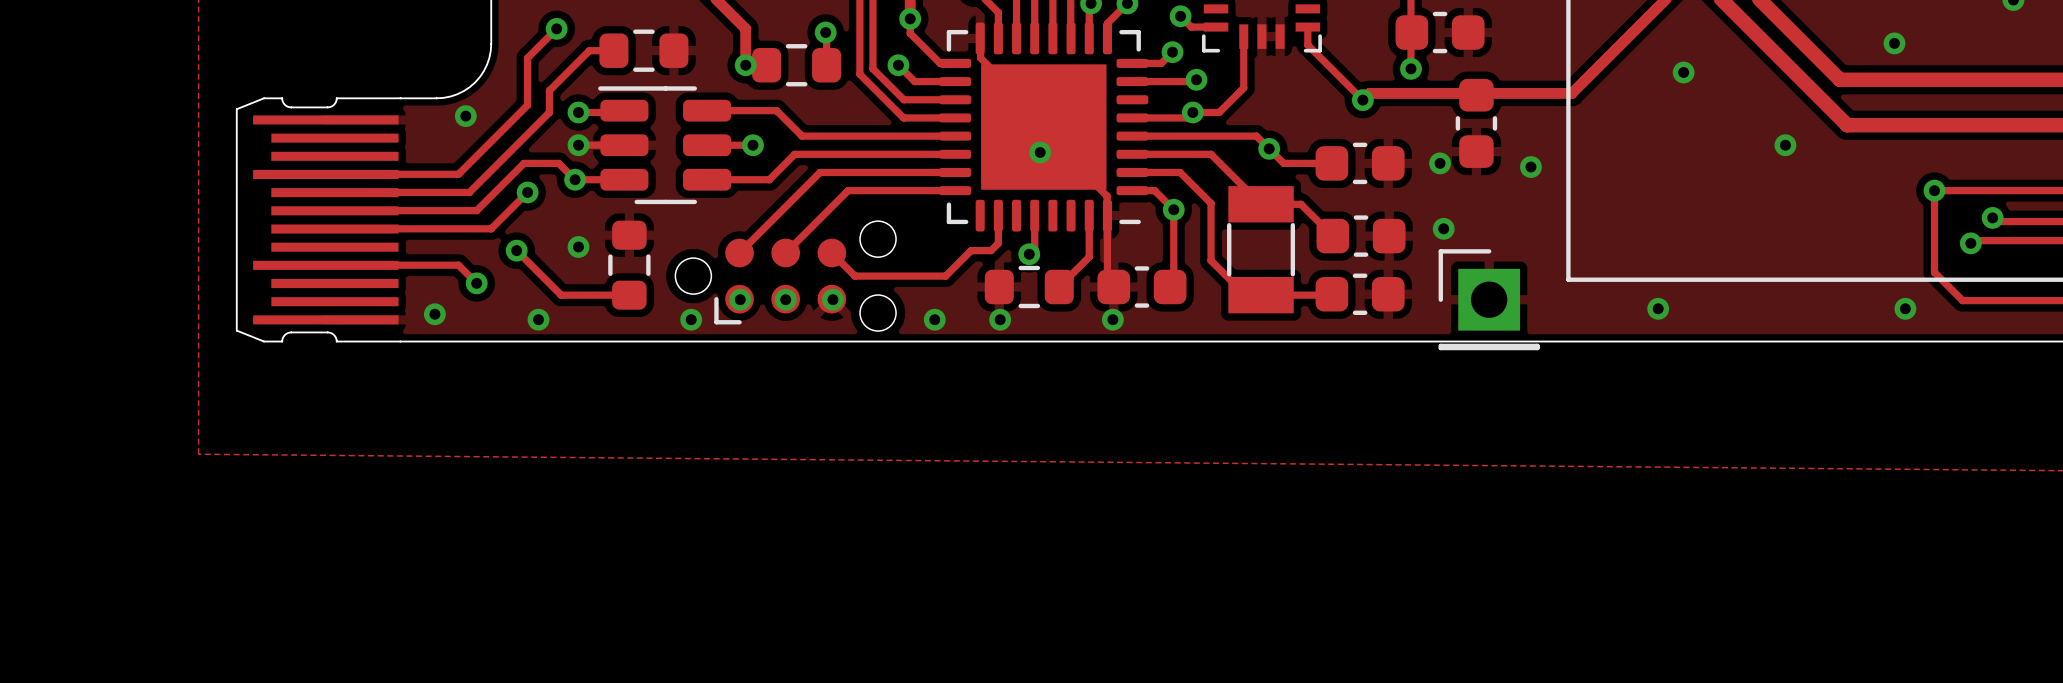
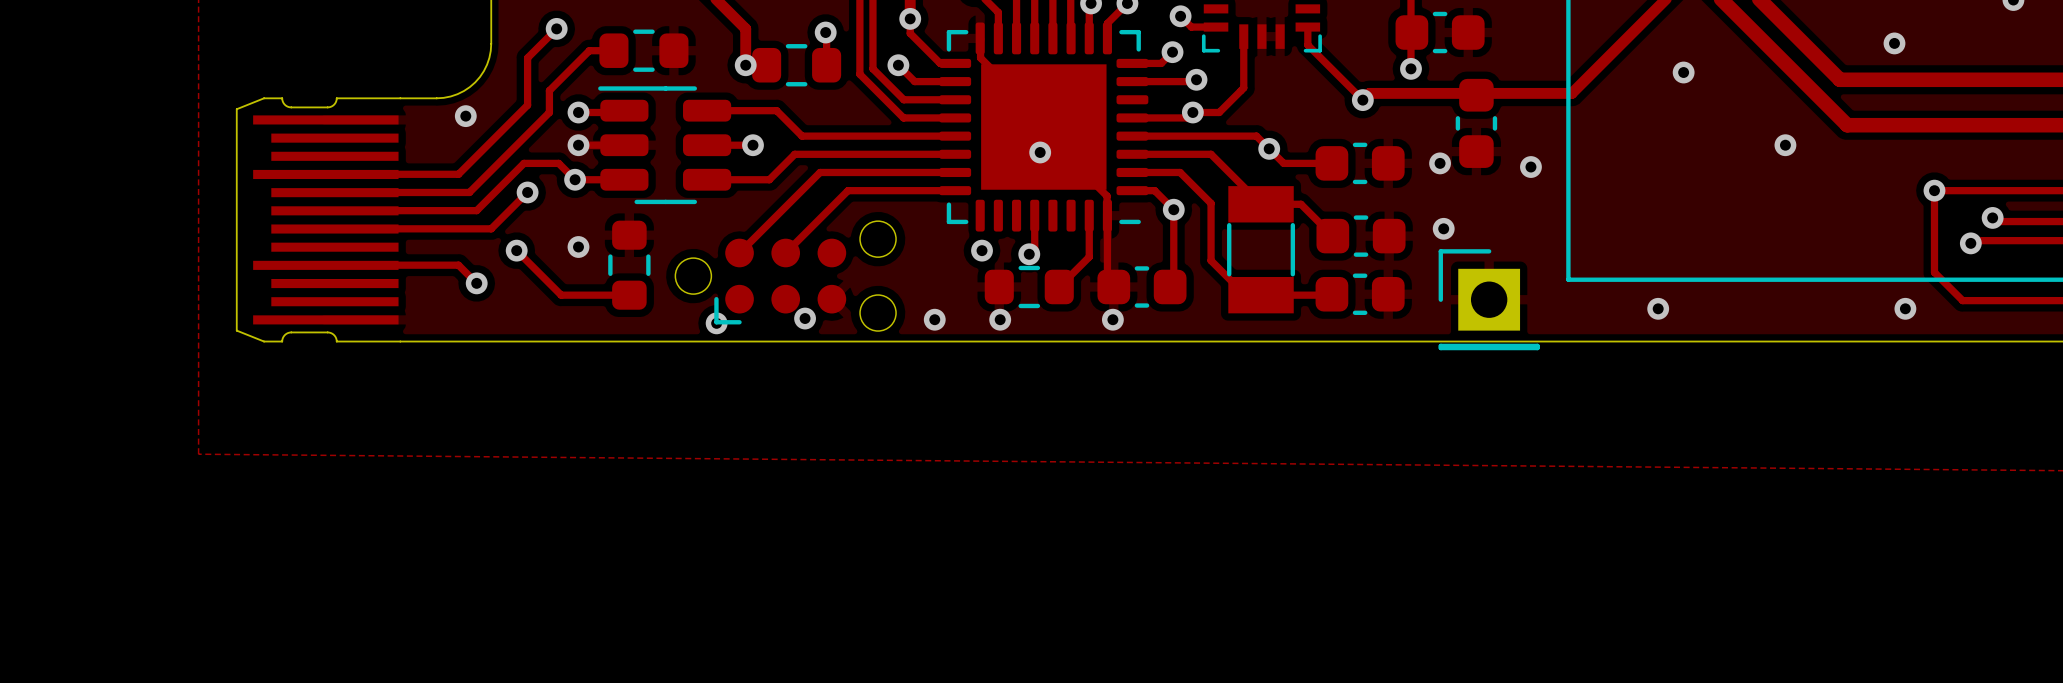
track: (998, 215) (998, 243) (991, 250) (971, 250) (945, 276) (854, 276) (831, 253) -> none
via: none -> (982, 250)
via: (740, 299) -> none
via position: (785, 299) -> (805, 318)
via: (832, 299) -> none
via: (434, 314) -> none
via: (538, 319) -> none
via: (691, 319) -> none
via: none -> (716, 323)

